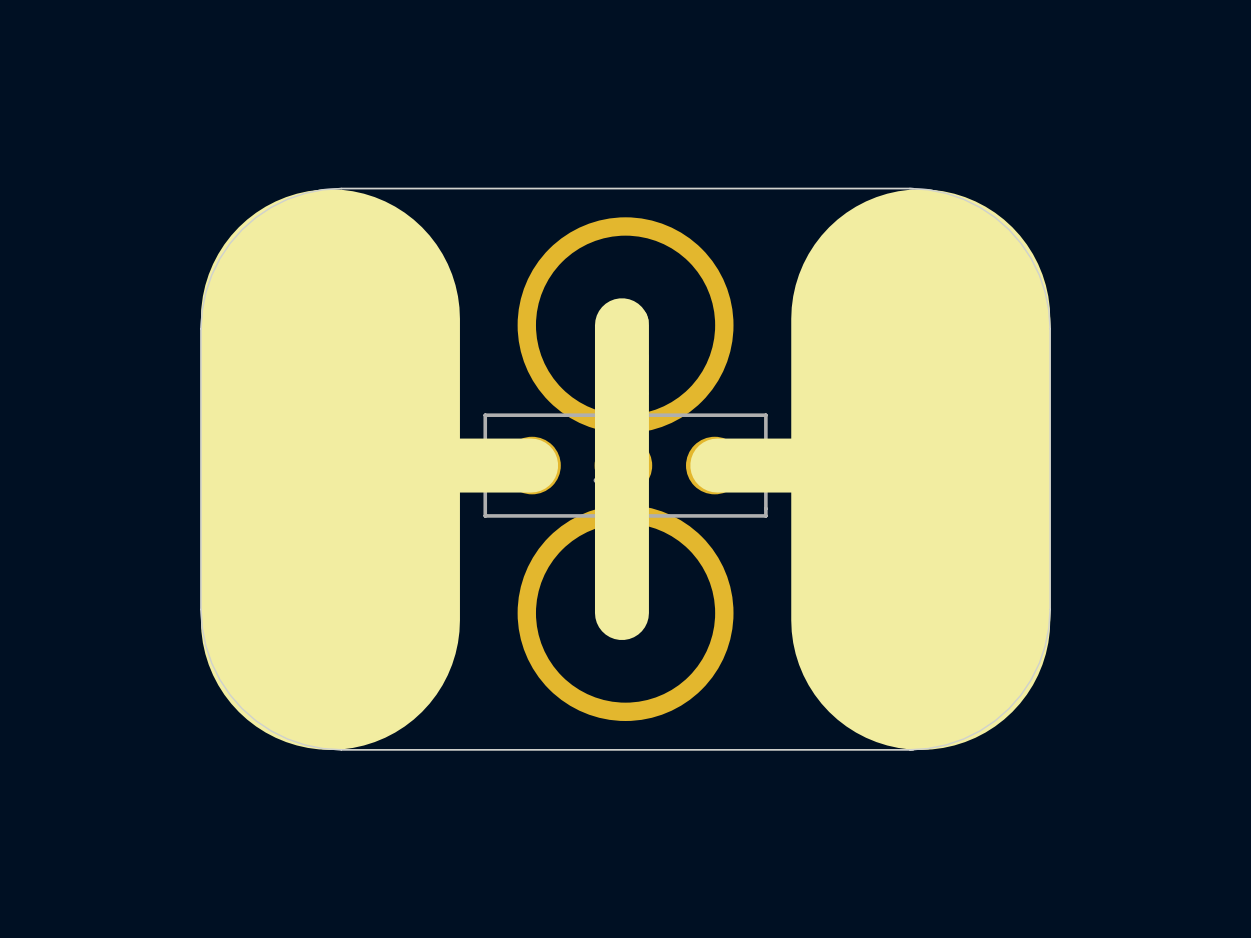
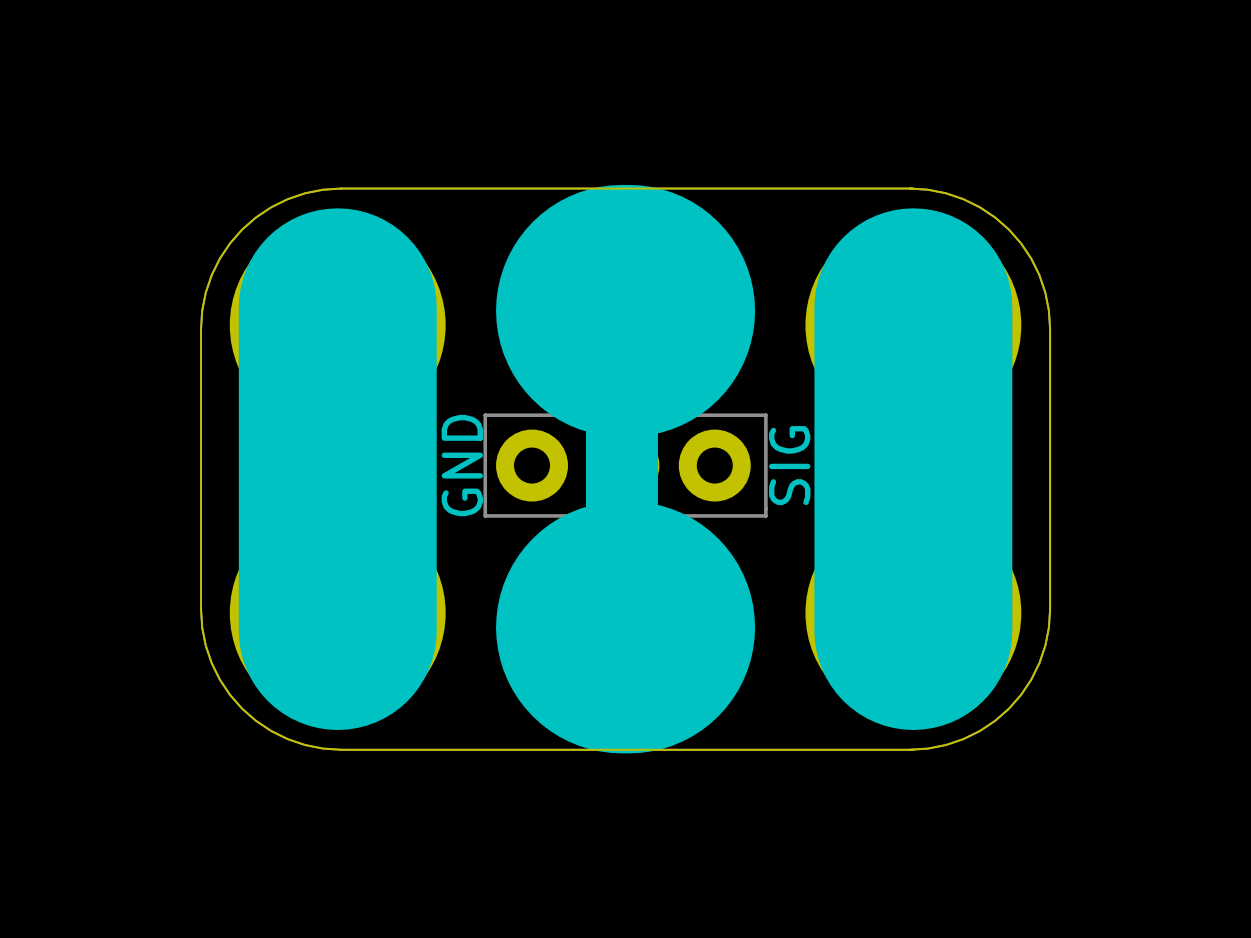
part footprint: [200, 187, 1051, 751] -> [200, 184, 1051, 754]

